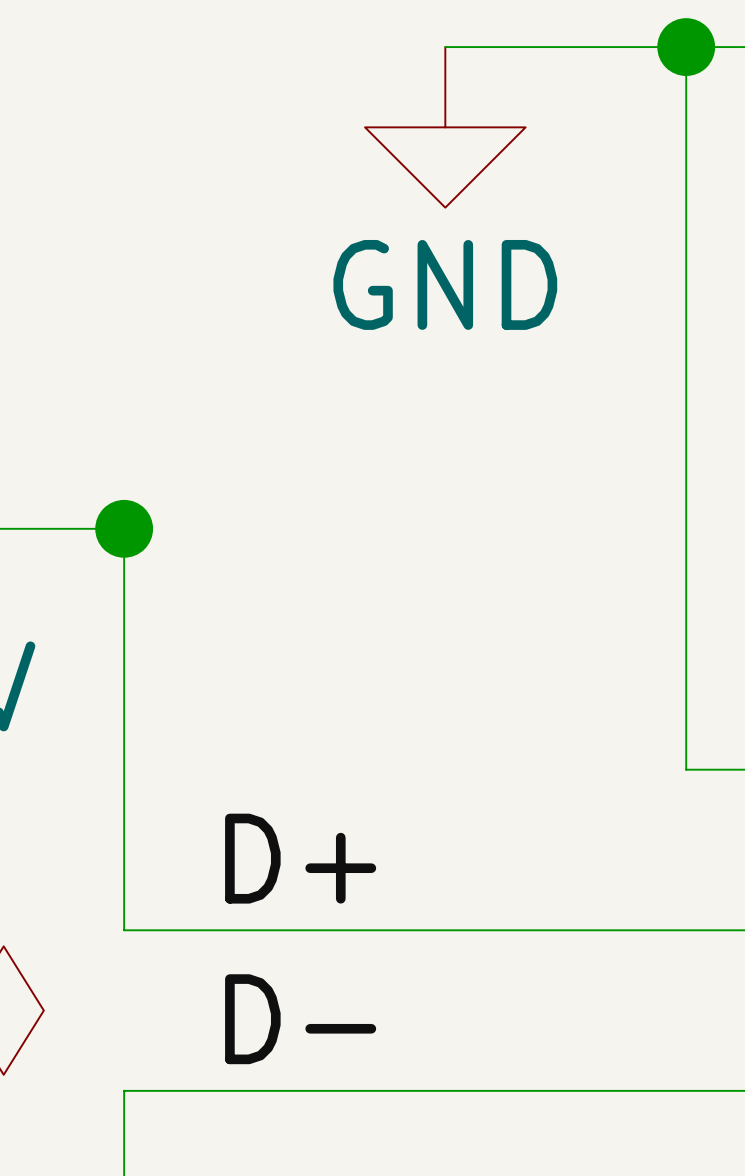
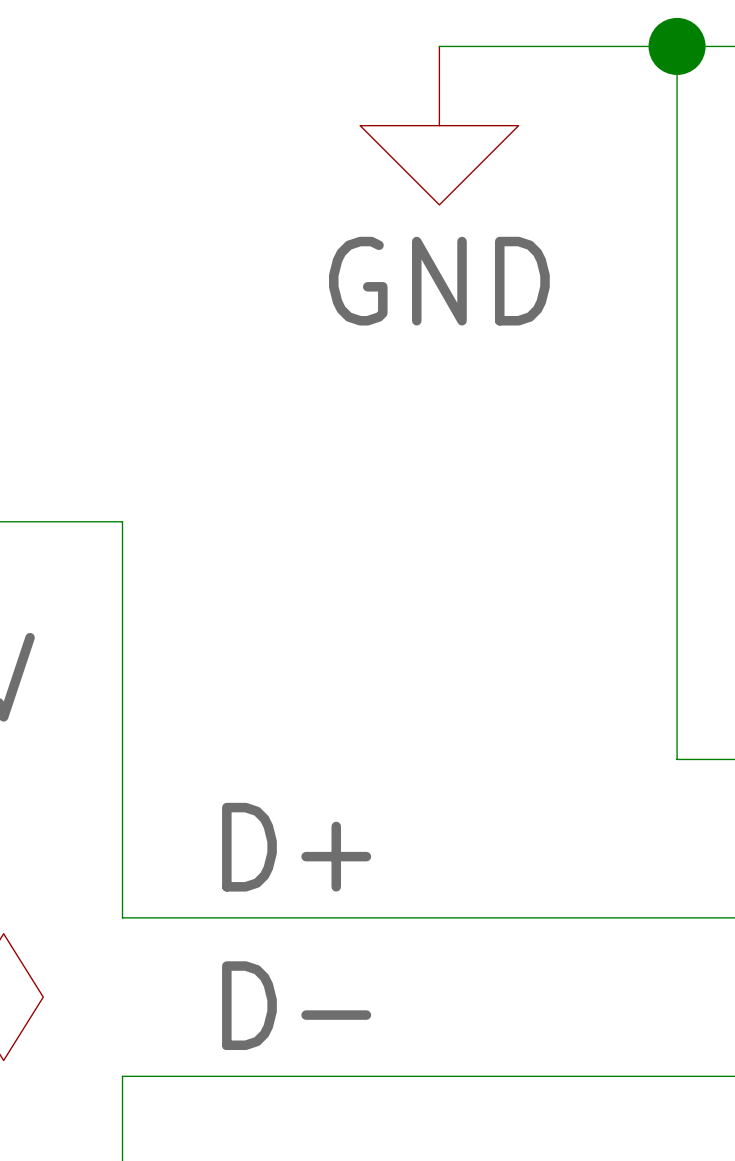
junction: (124, 528) -> none

